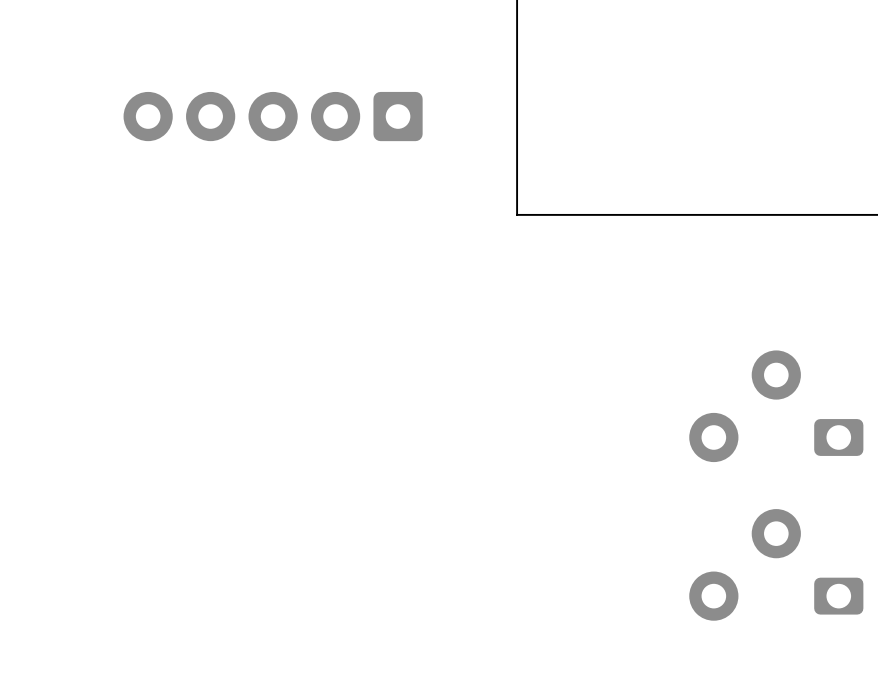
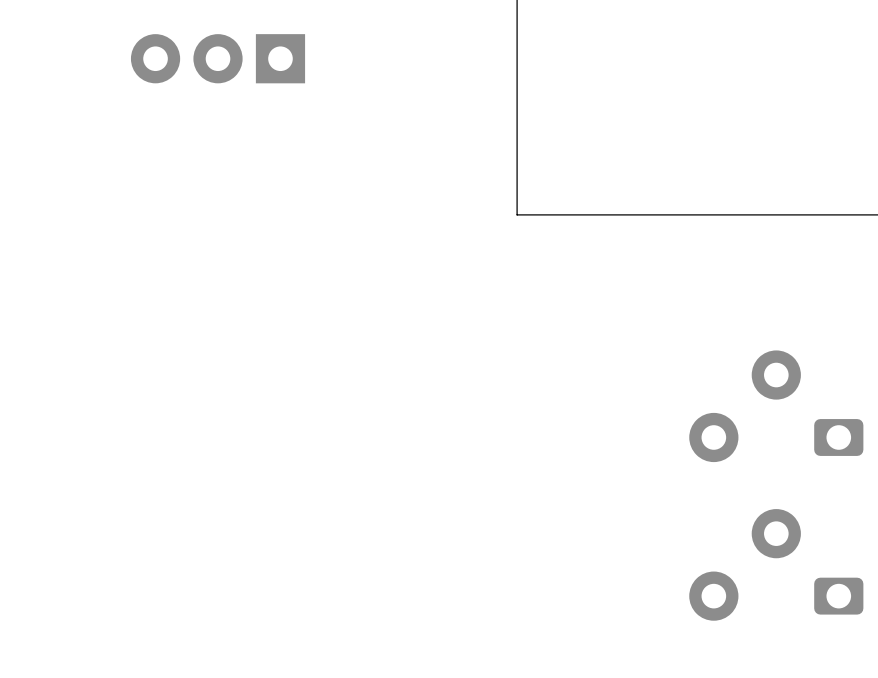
part: none -> (218, 58)
part: (273, 116) -> none

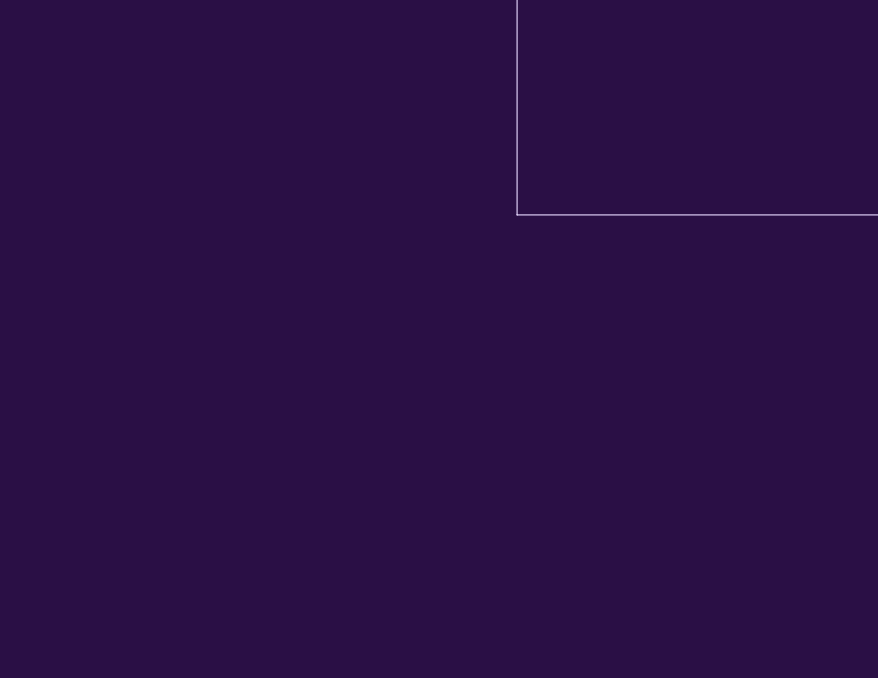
part: (218, 58) -> none
part: (776, 406) -> none
part: (776, 564) -> none

